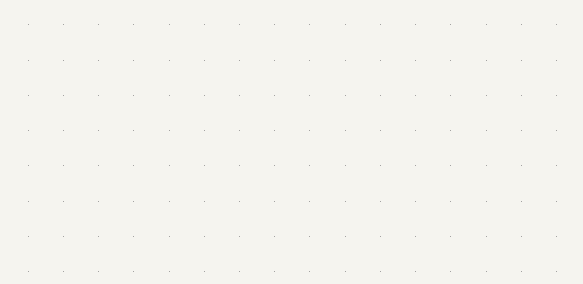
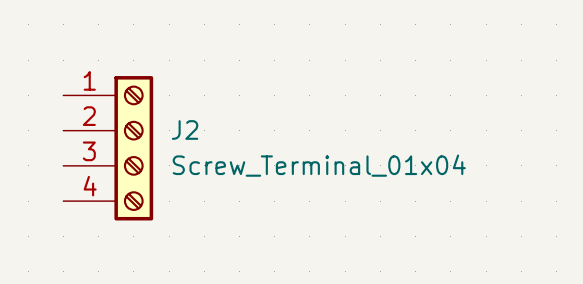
J2: none -> Screw_Terminal_01x04 (108, 148)

